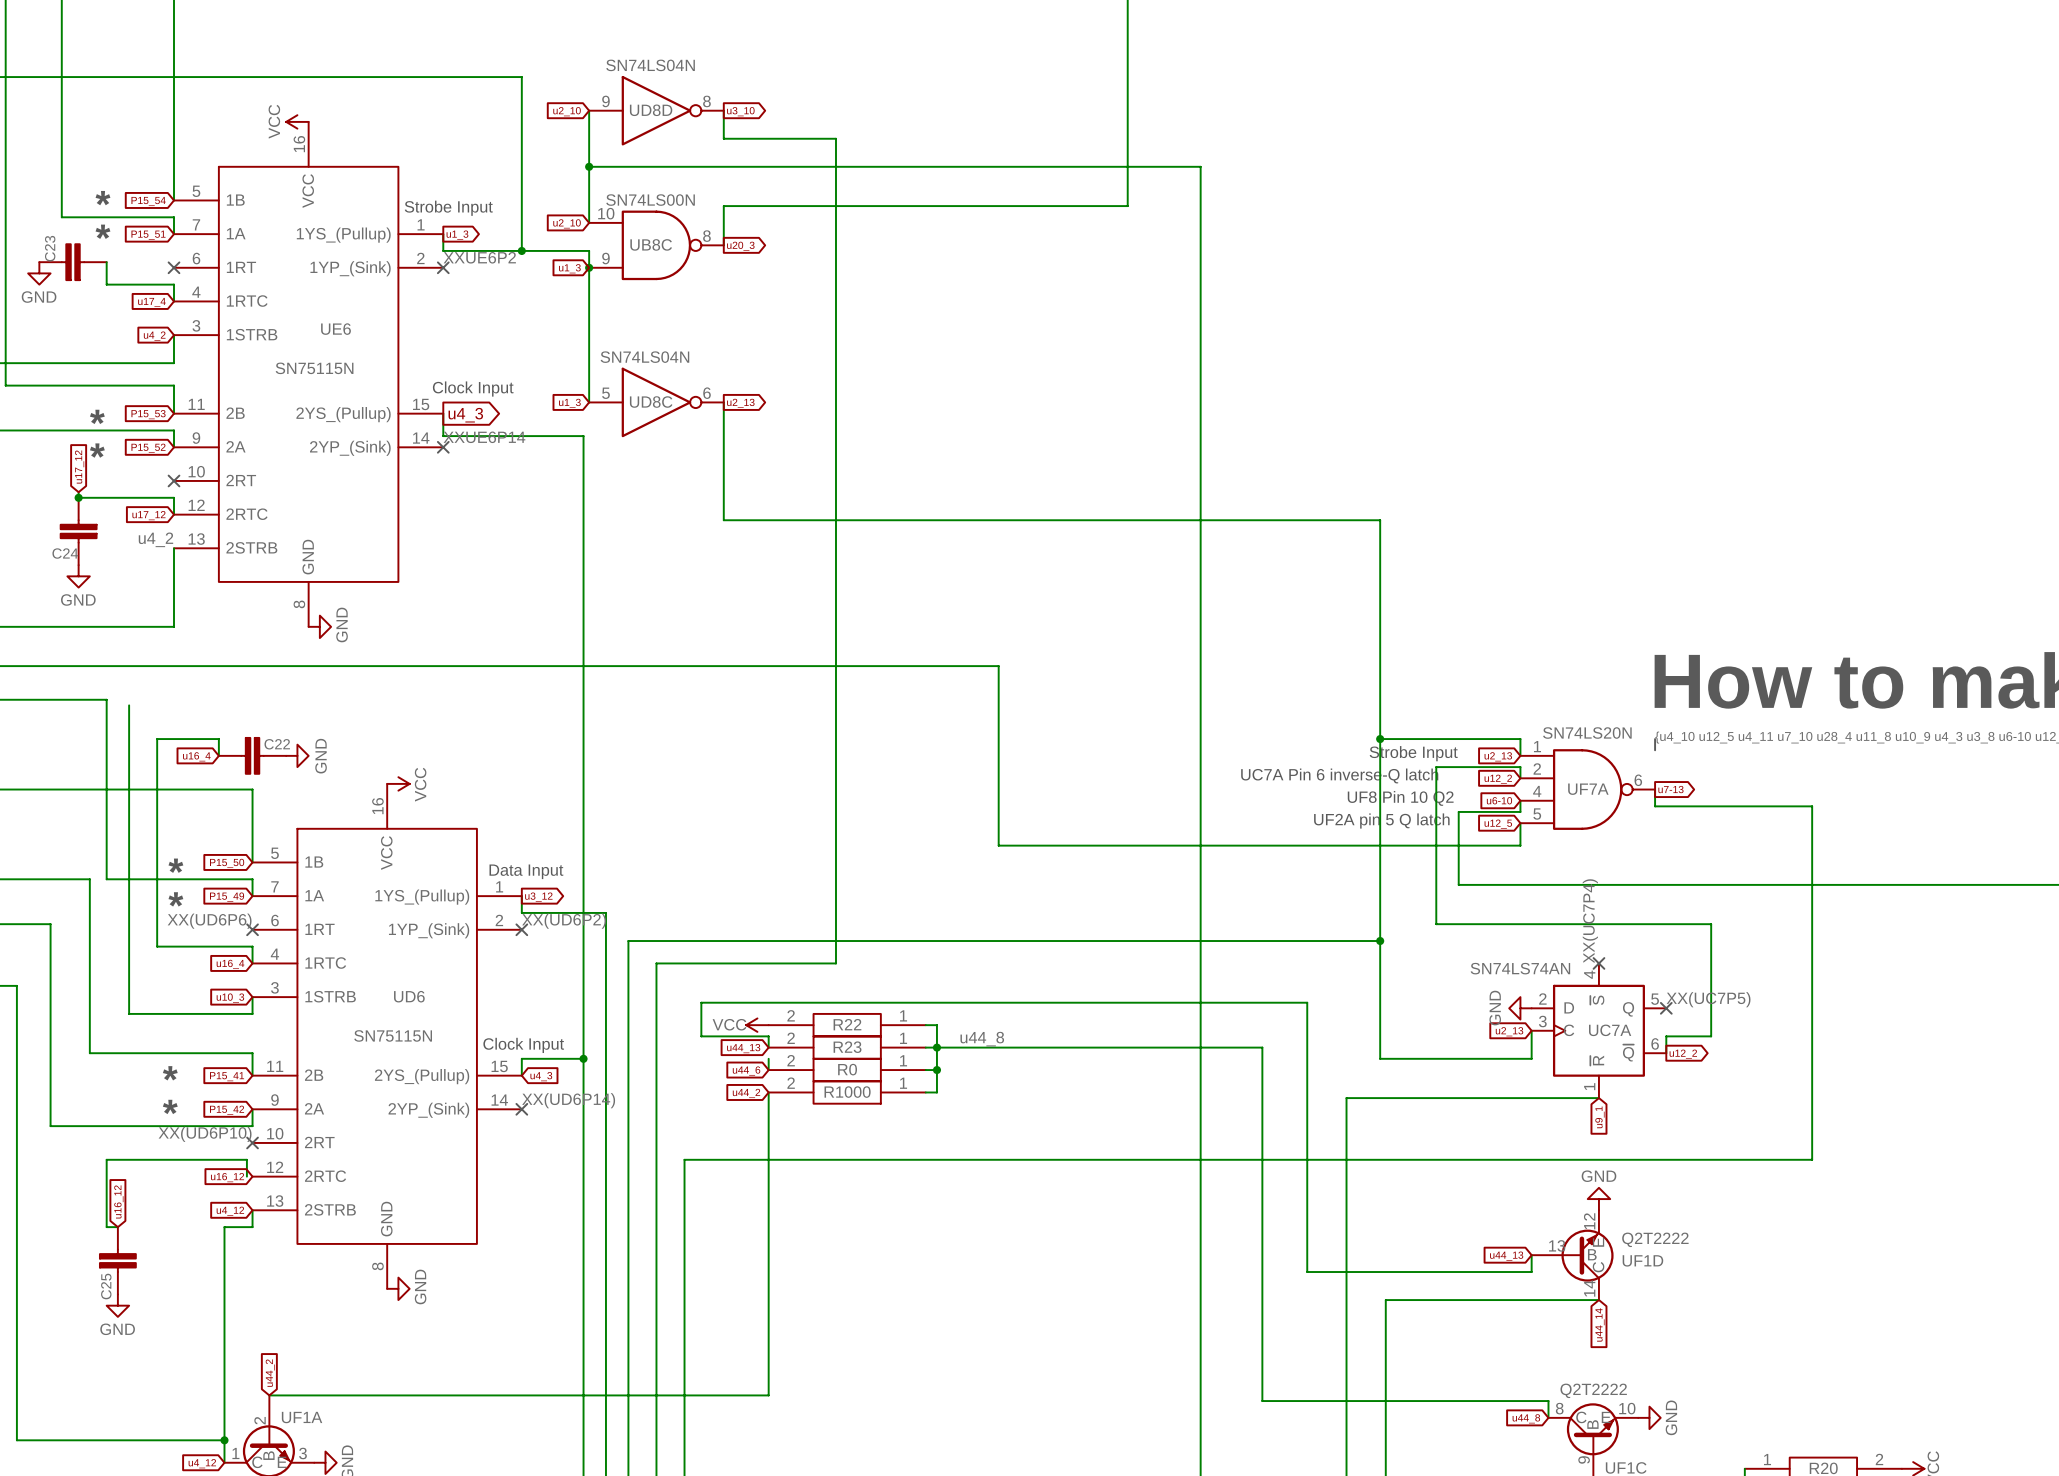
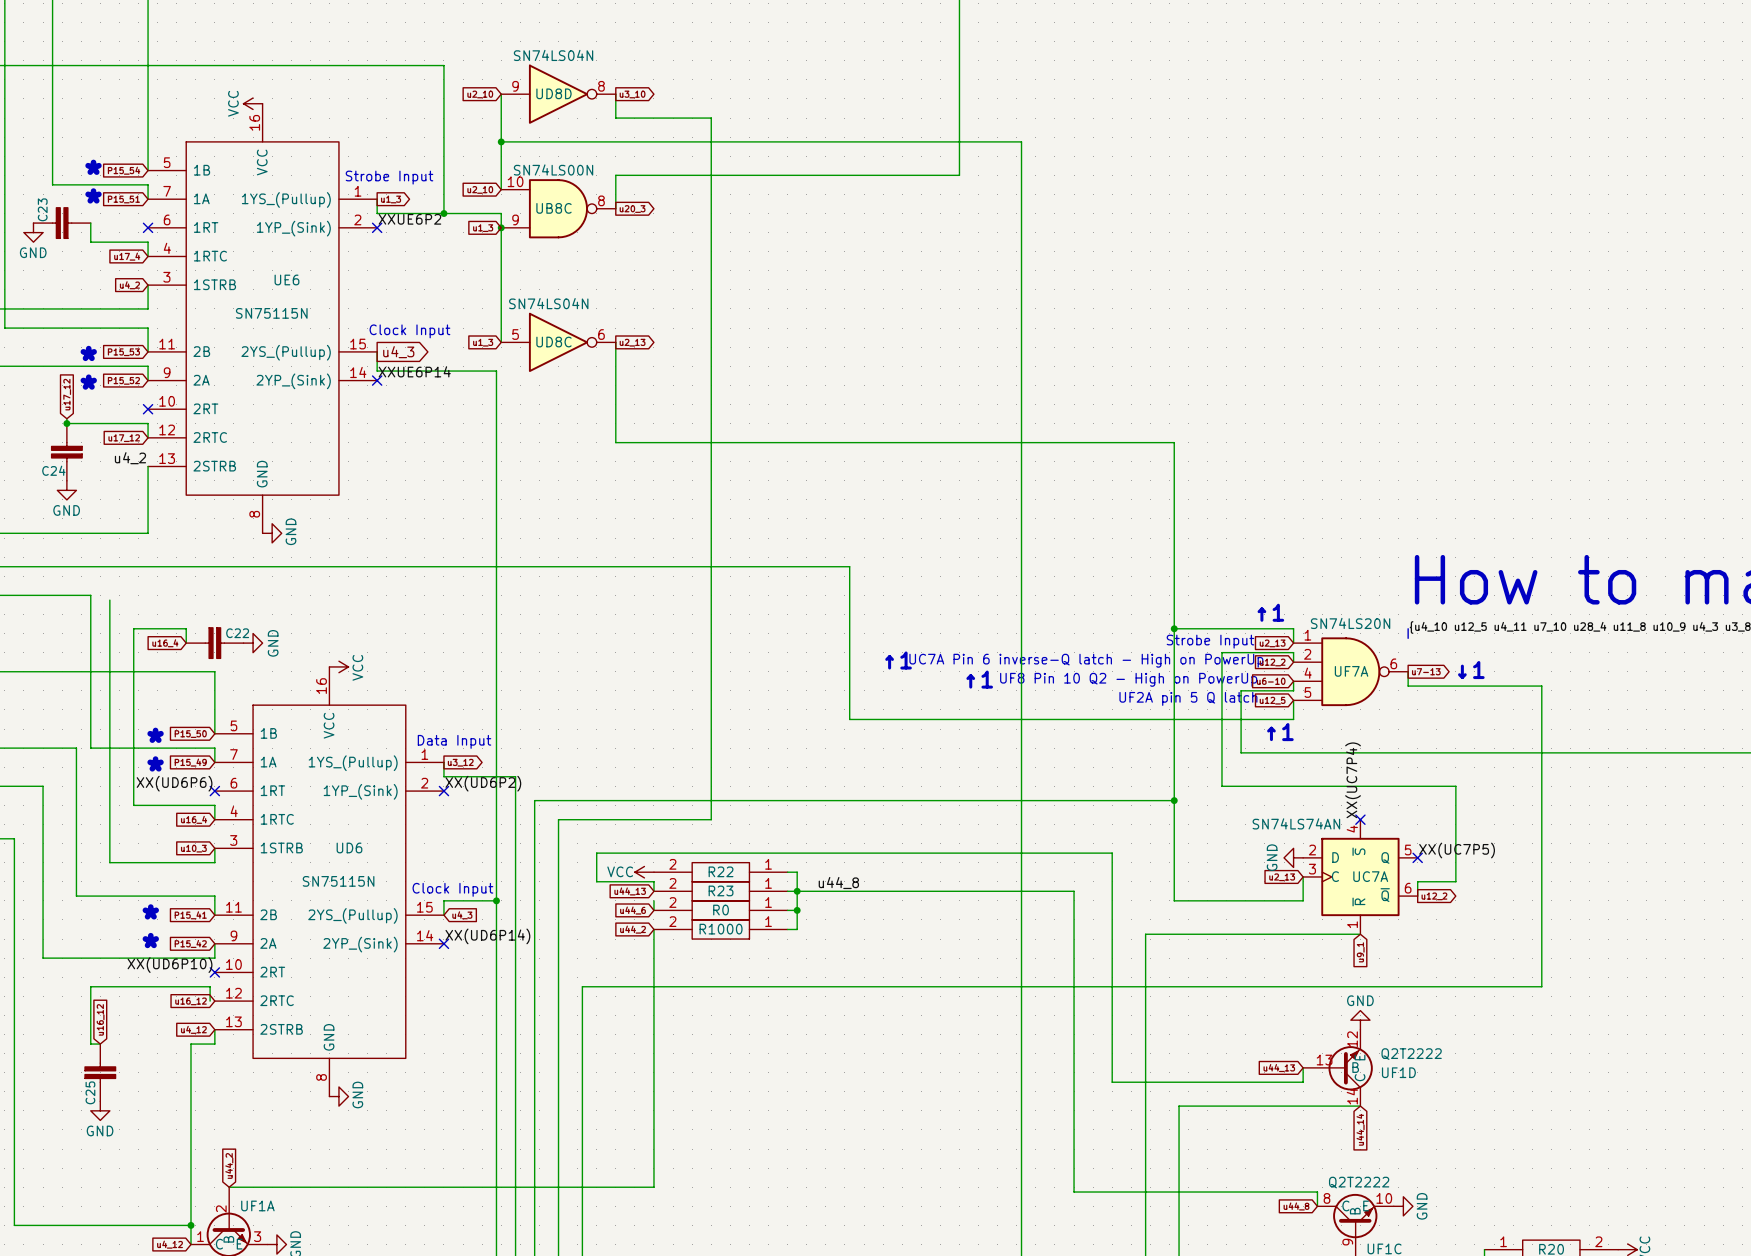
text: none -> ↑1 (1270, 612)
text: UC7A Pin 6 inverse-Q latch (1339, 775) -> UC7A Pin 6 inverse-Q latch - High on PowerUp (1086, 660)
text: none -> ↑1 (898, 660)
text: none -> ↓1 (1471, 670)
text: none -> UF8 Pin 10 Q2 - High on PowerUp (1128, 679)
text: UF8 Pin 10 Q2 (1400, 798) -> none
text: none -> ↑1 (979, 679)
text: none -> ↑1 (1280, 732)

